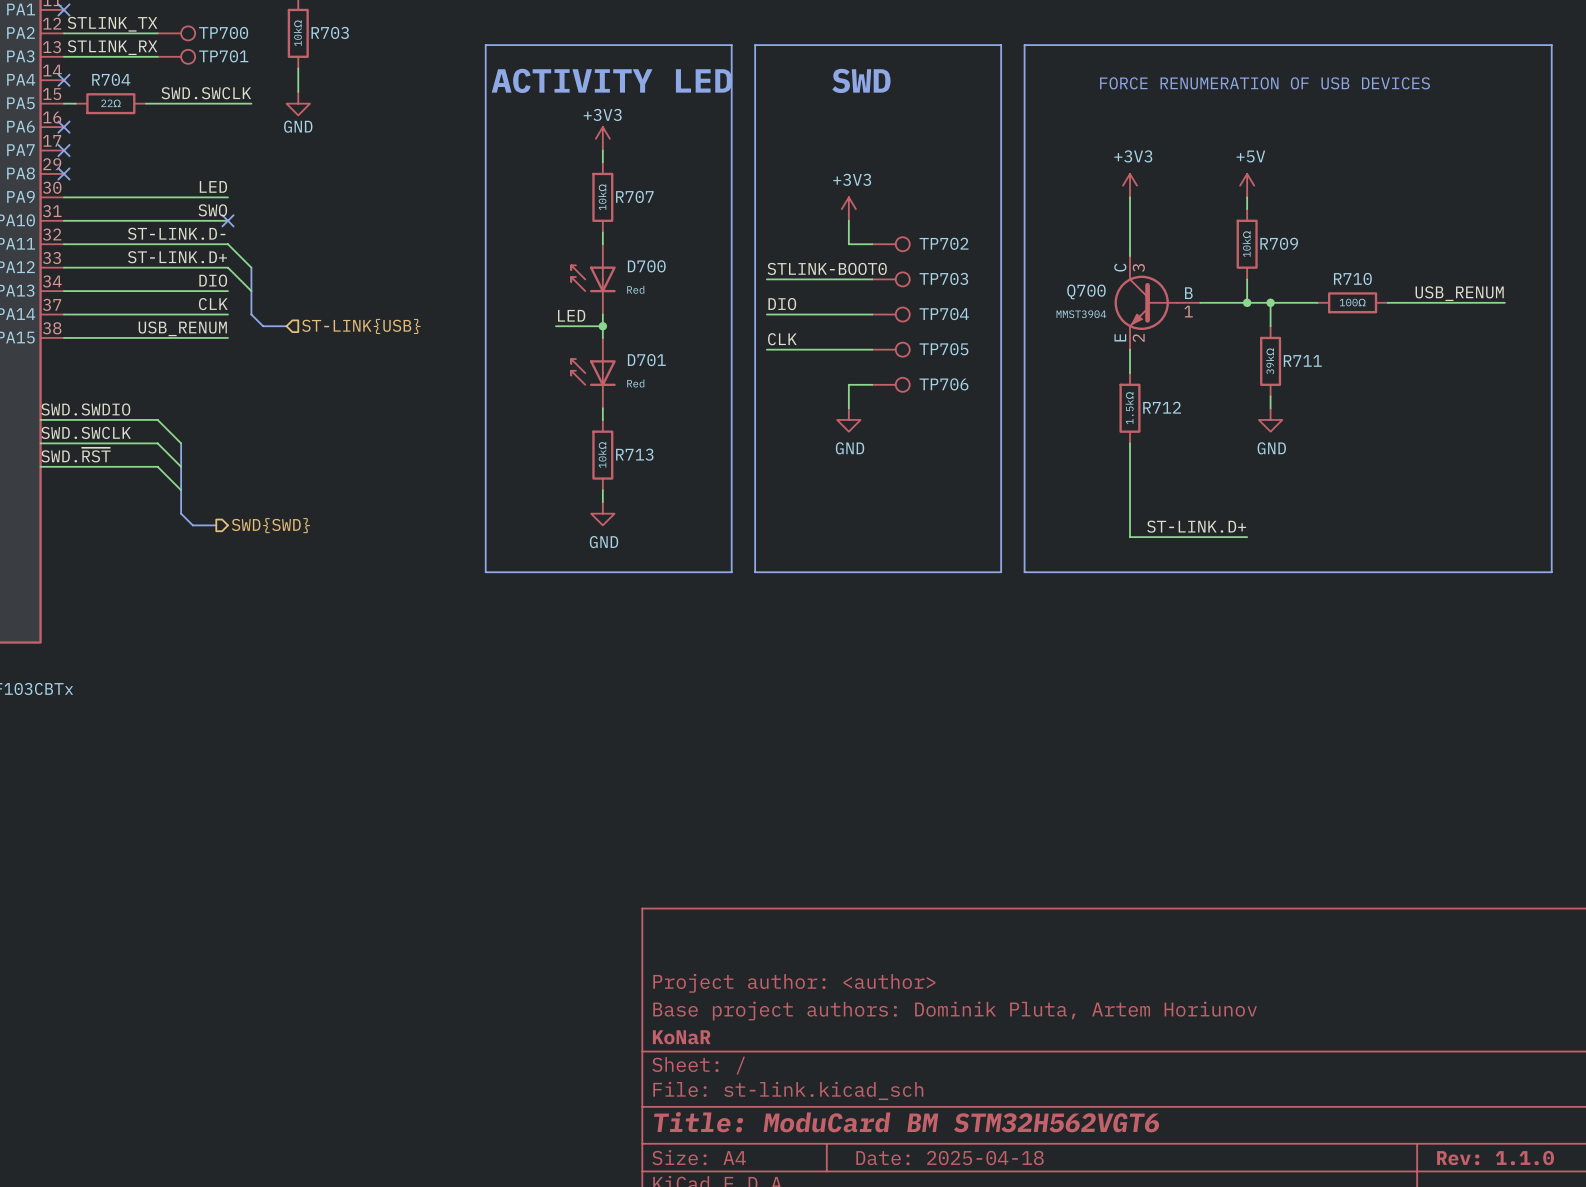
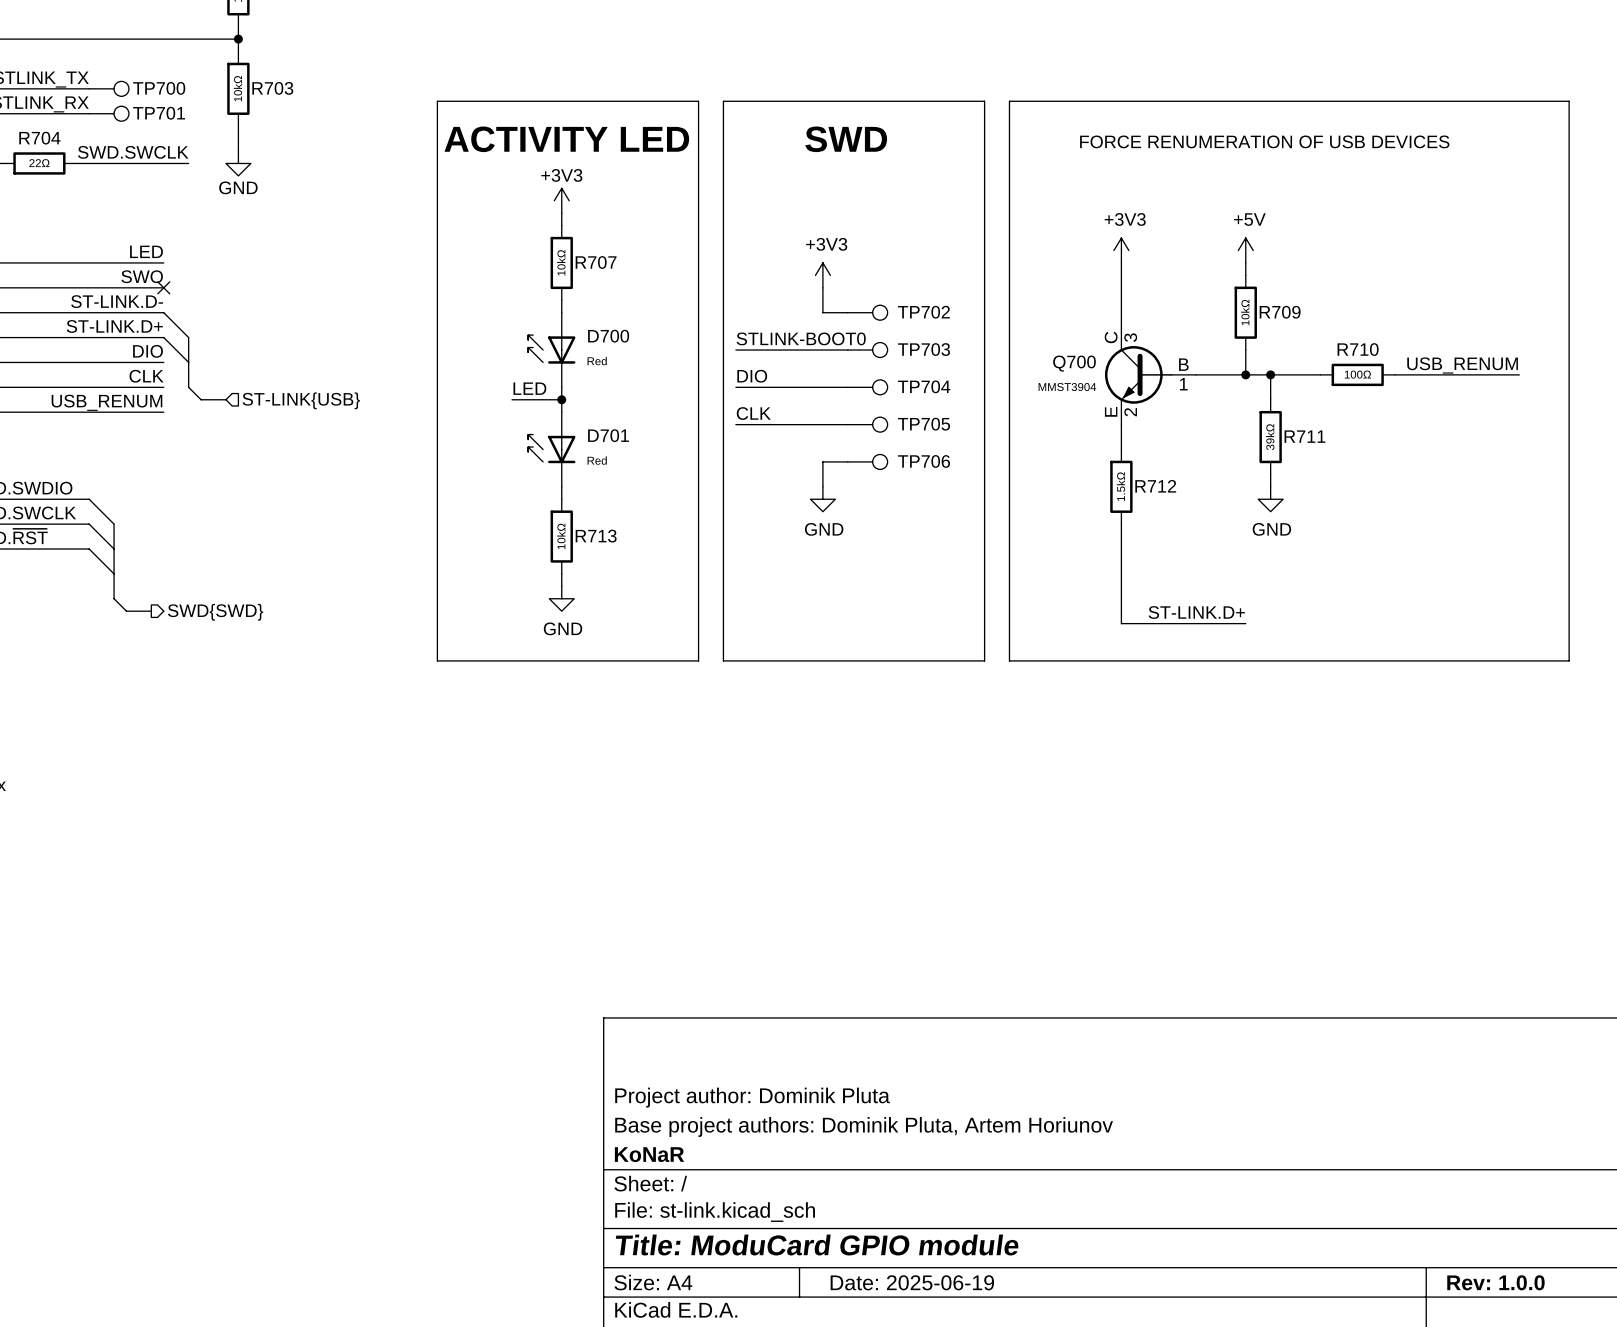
title block: Project author: <author> (794, 983) -> Project author: Dominik Pluta (752, 1097)
title block: Title: ModuCard BM STM32H562VGT6 (906, 1122) -> Title: ModuCard GPIO module (817, 1245)
title block: Date: 2025-04-18 (950, 1158) -> Date: 2025-06-19 (912, 1282)
title block: Rev: 1.1.0 (1495, 1158) -> Rev: 1.0.0 (1495, 1282)

